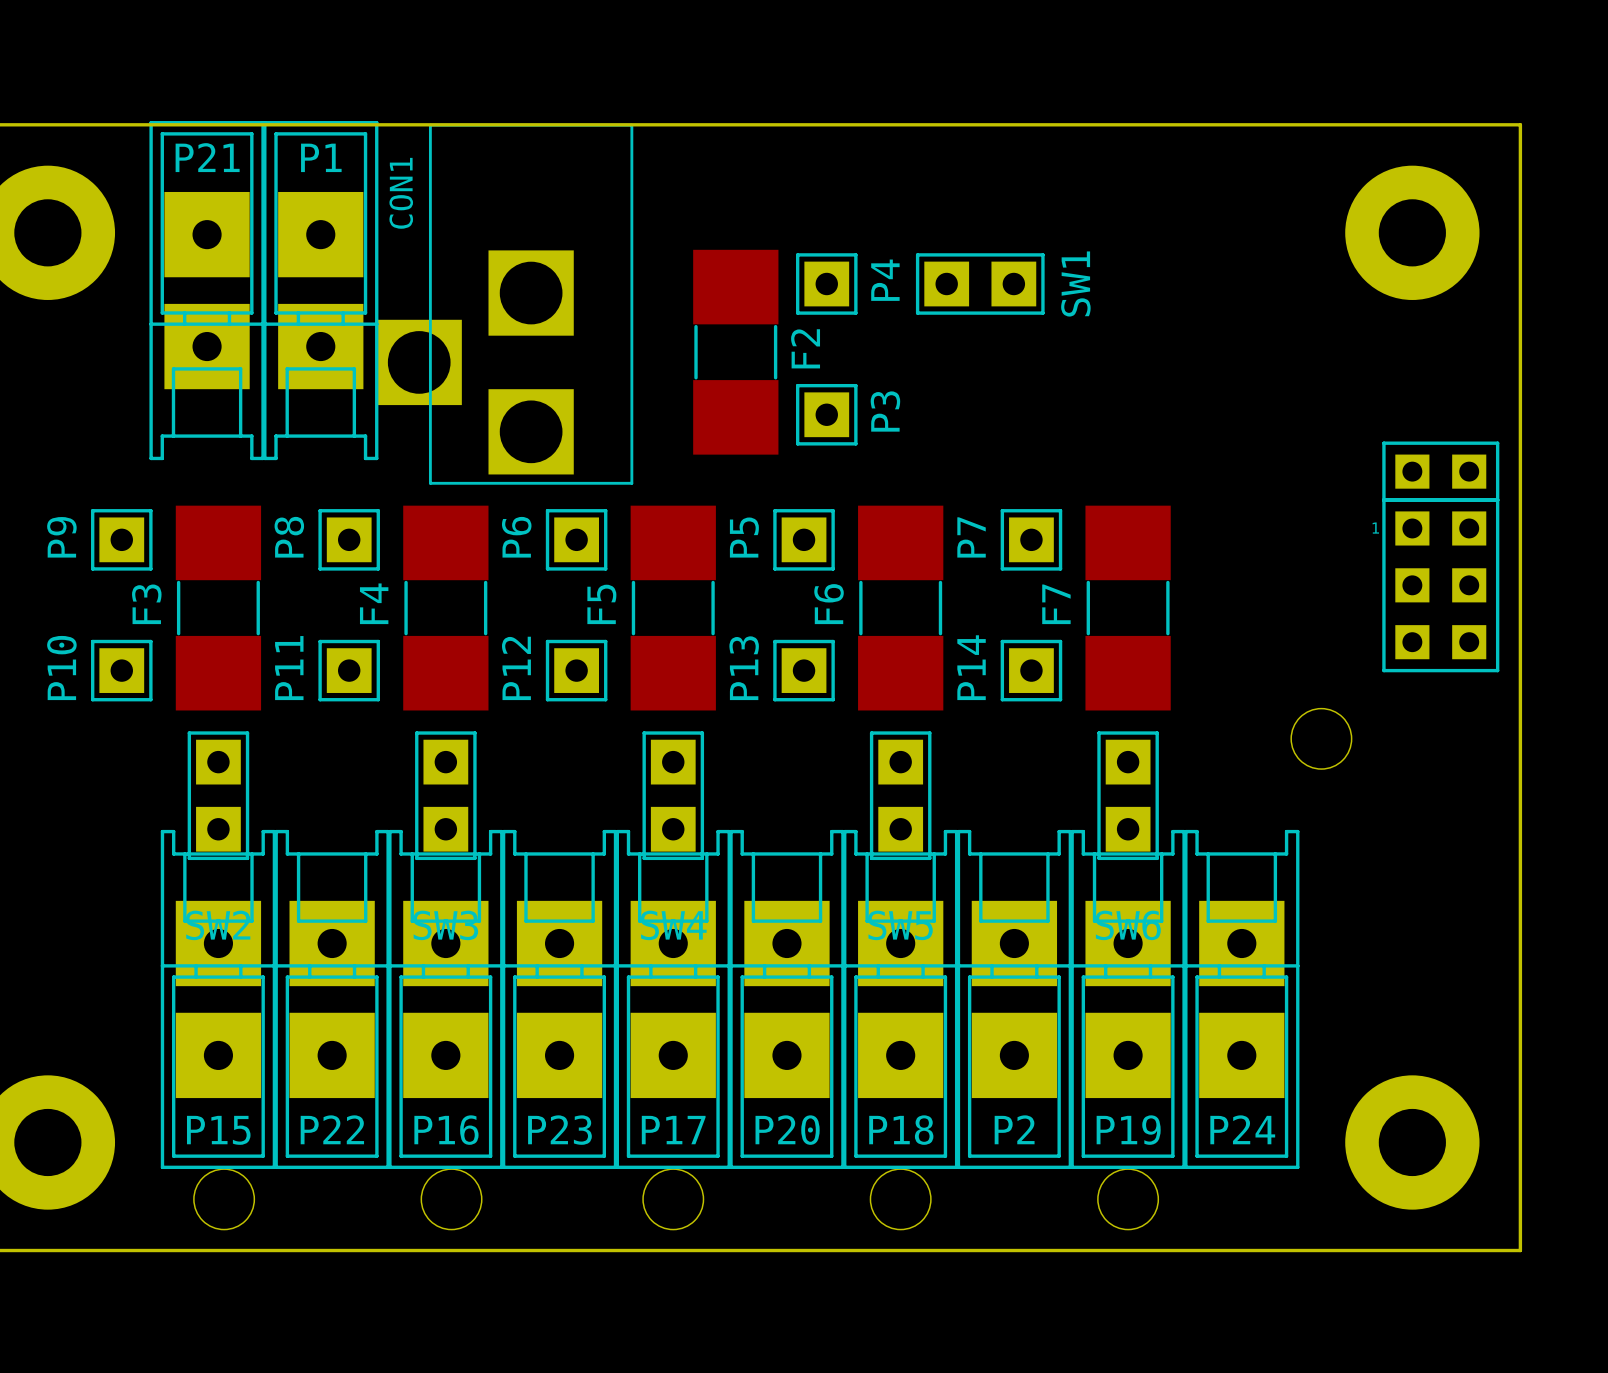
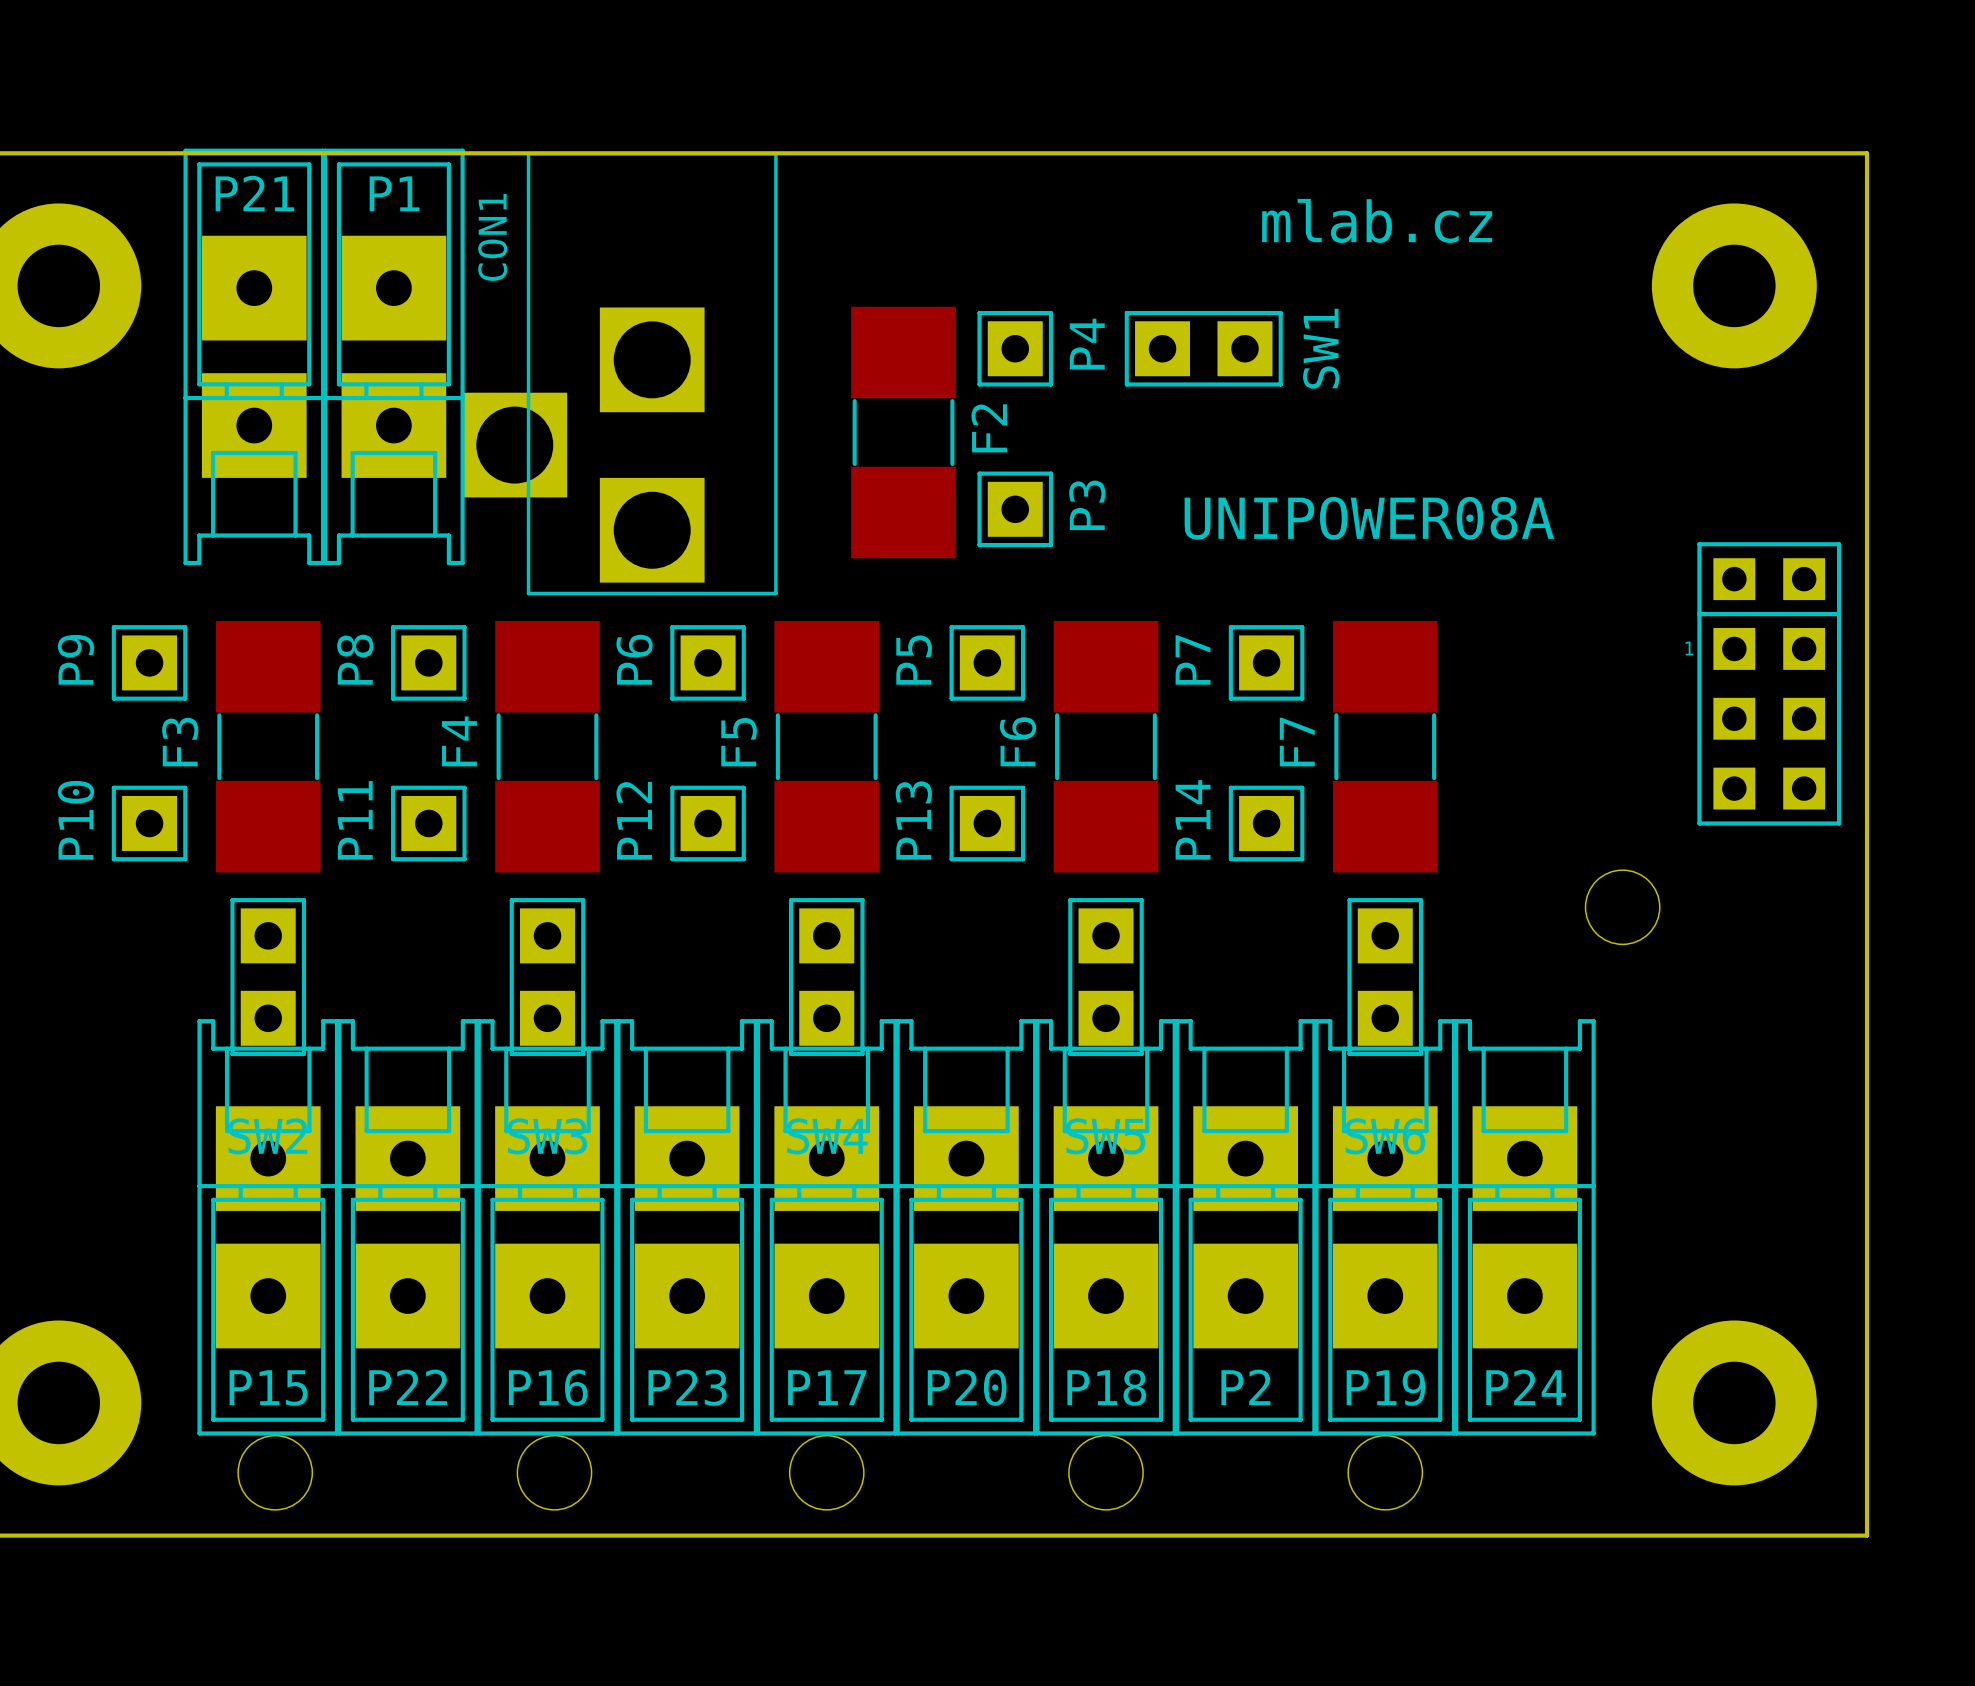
text: none -> mlab.cz (1377, 220)
text: none -> UNIPOWER08A (1369, 518)

